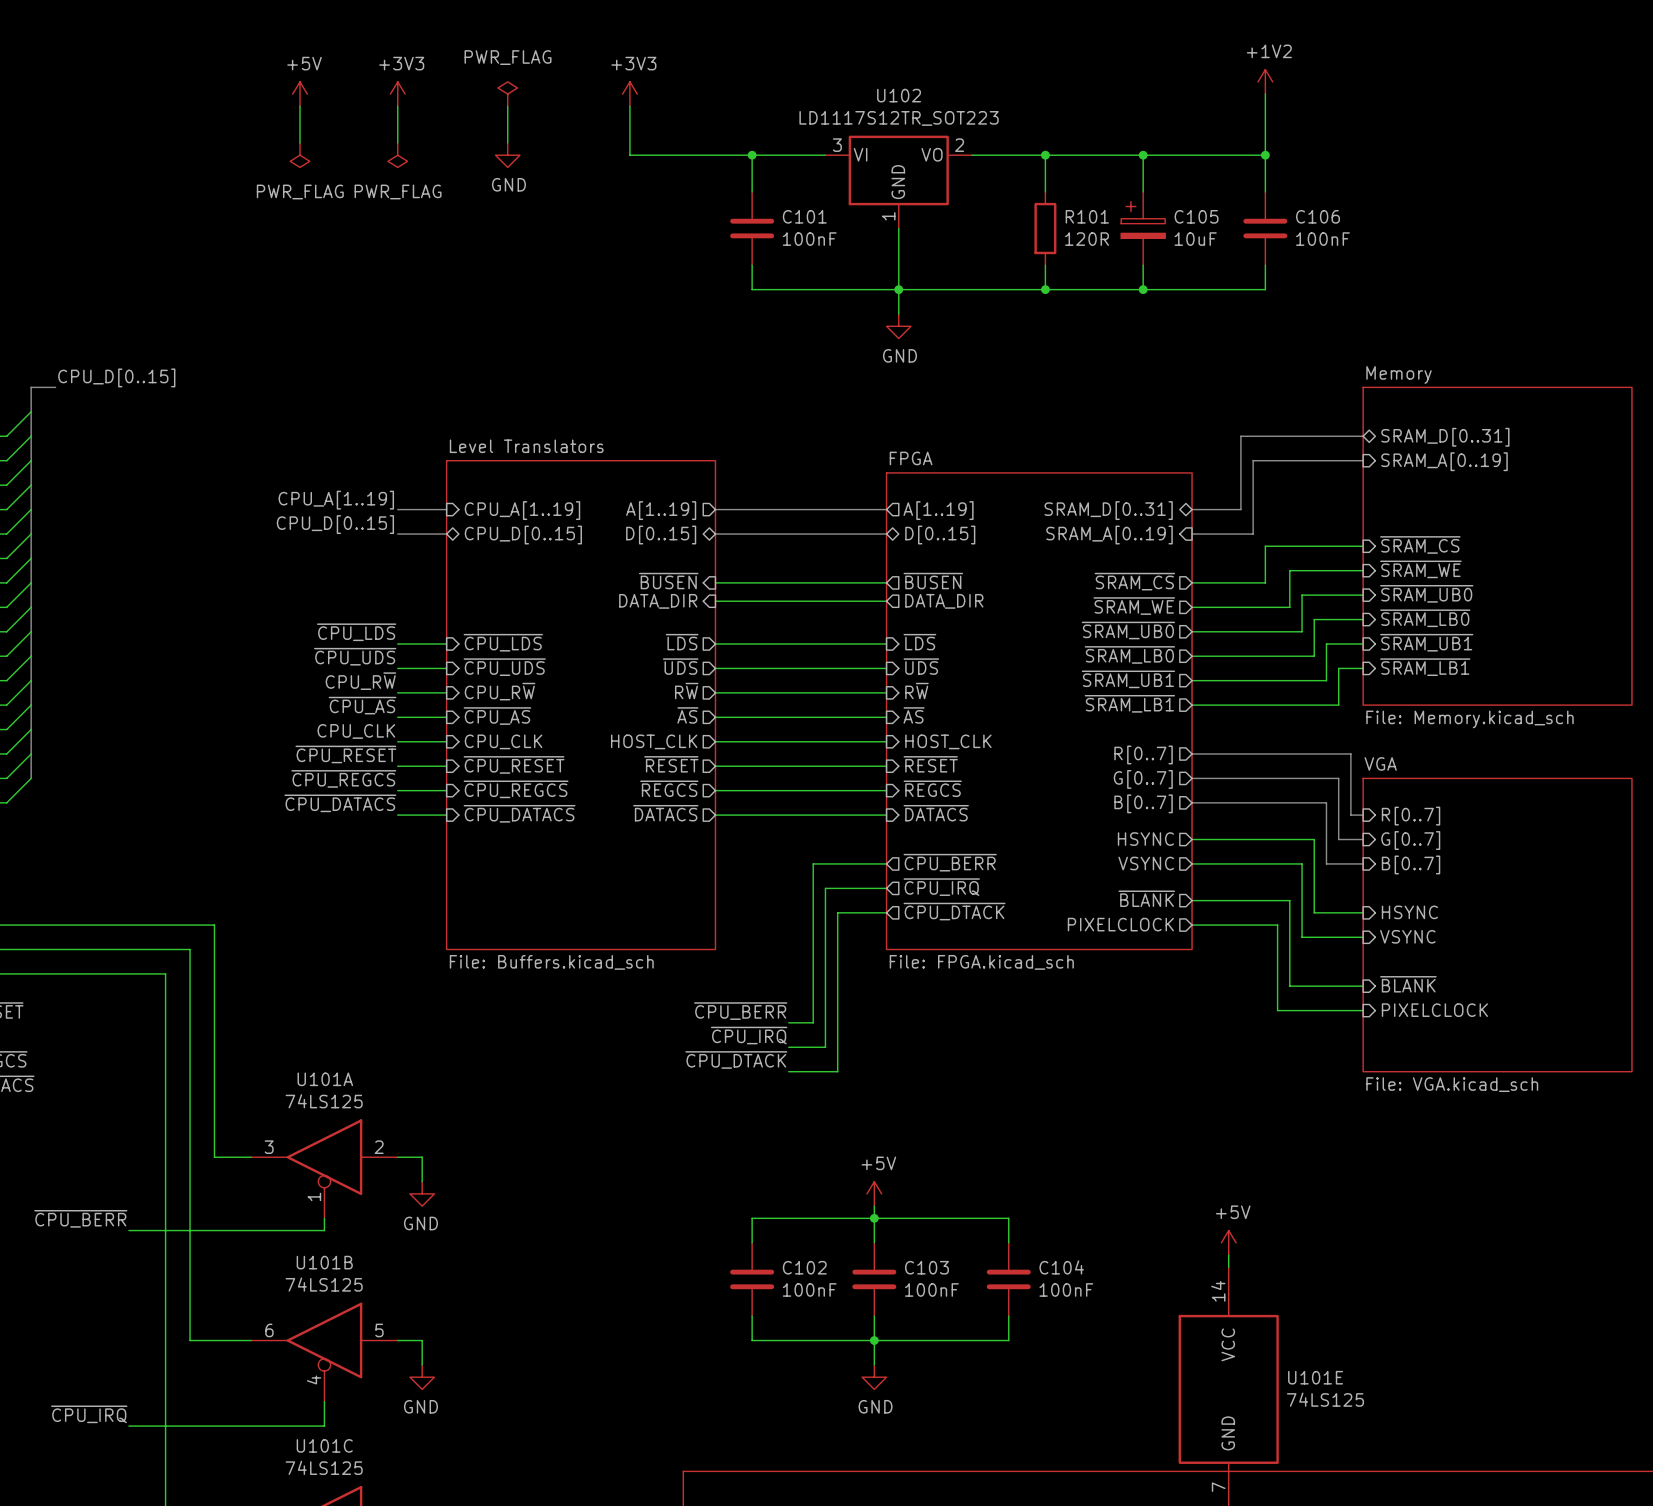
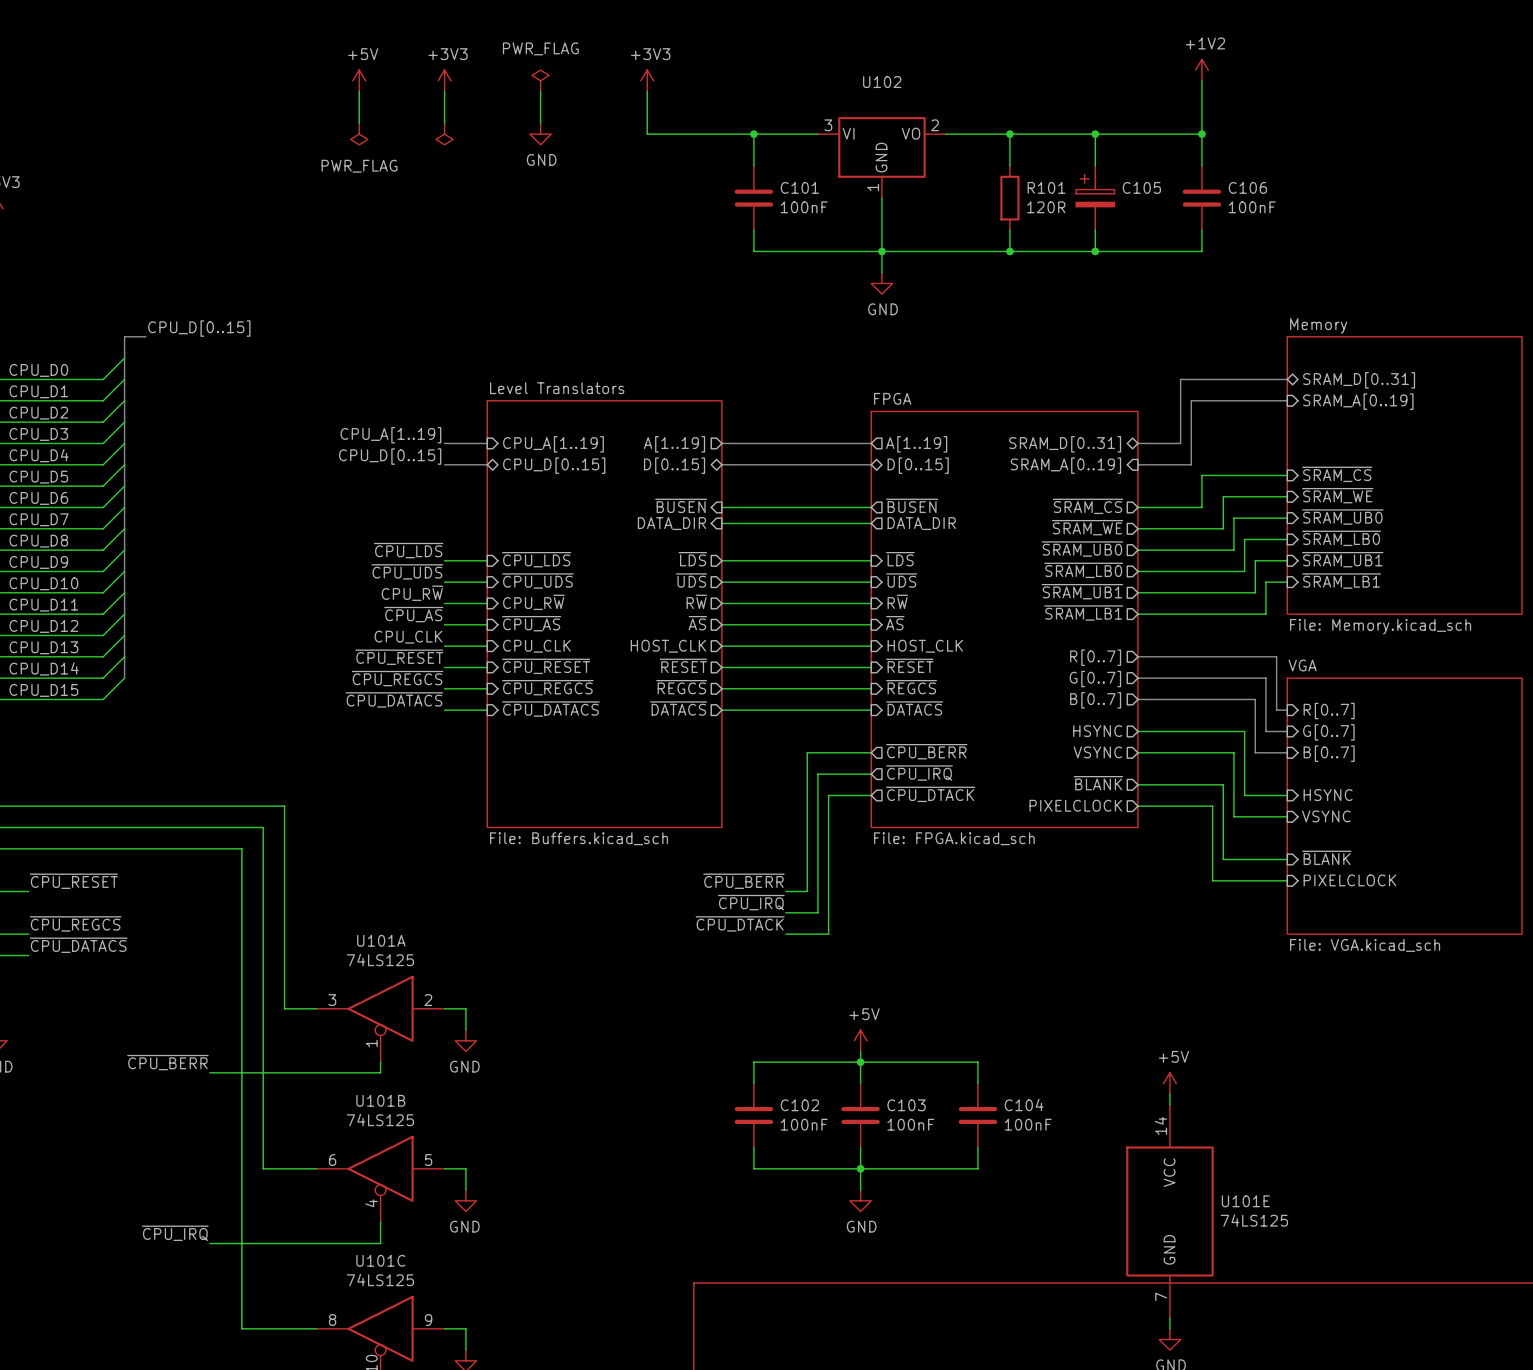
U102 value: LD1117S12TR_SOT223 (899, 118) -> none
power symbol text: PWR_FLAG (398, 191) -> none
C105 value: 10uF (1195, 239) -> none

